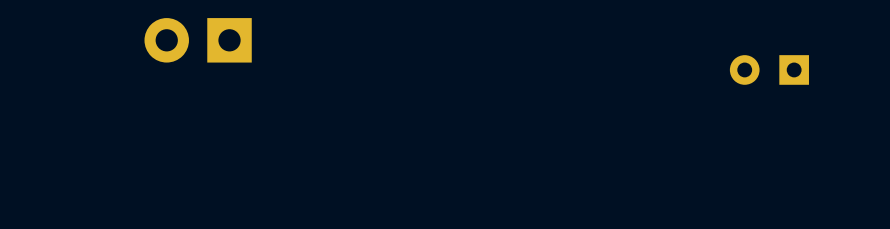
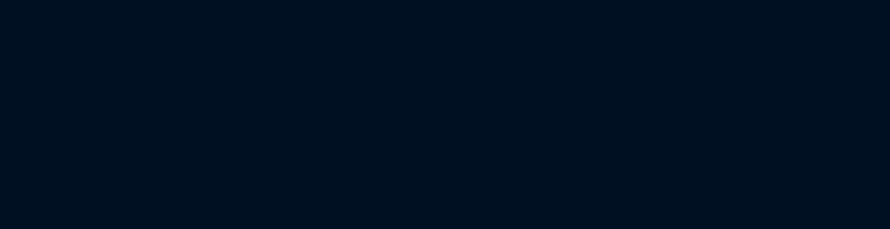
part: (198, 40) -> none
part: (769, 69) -> none

